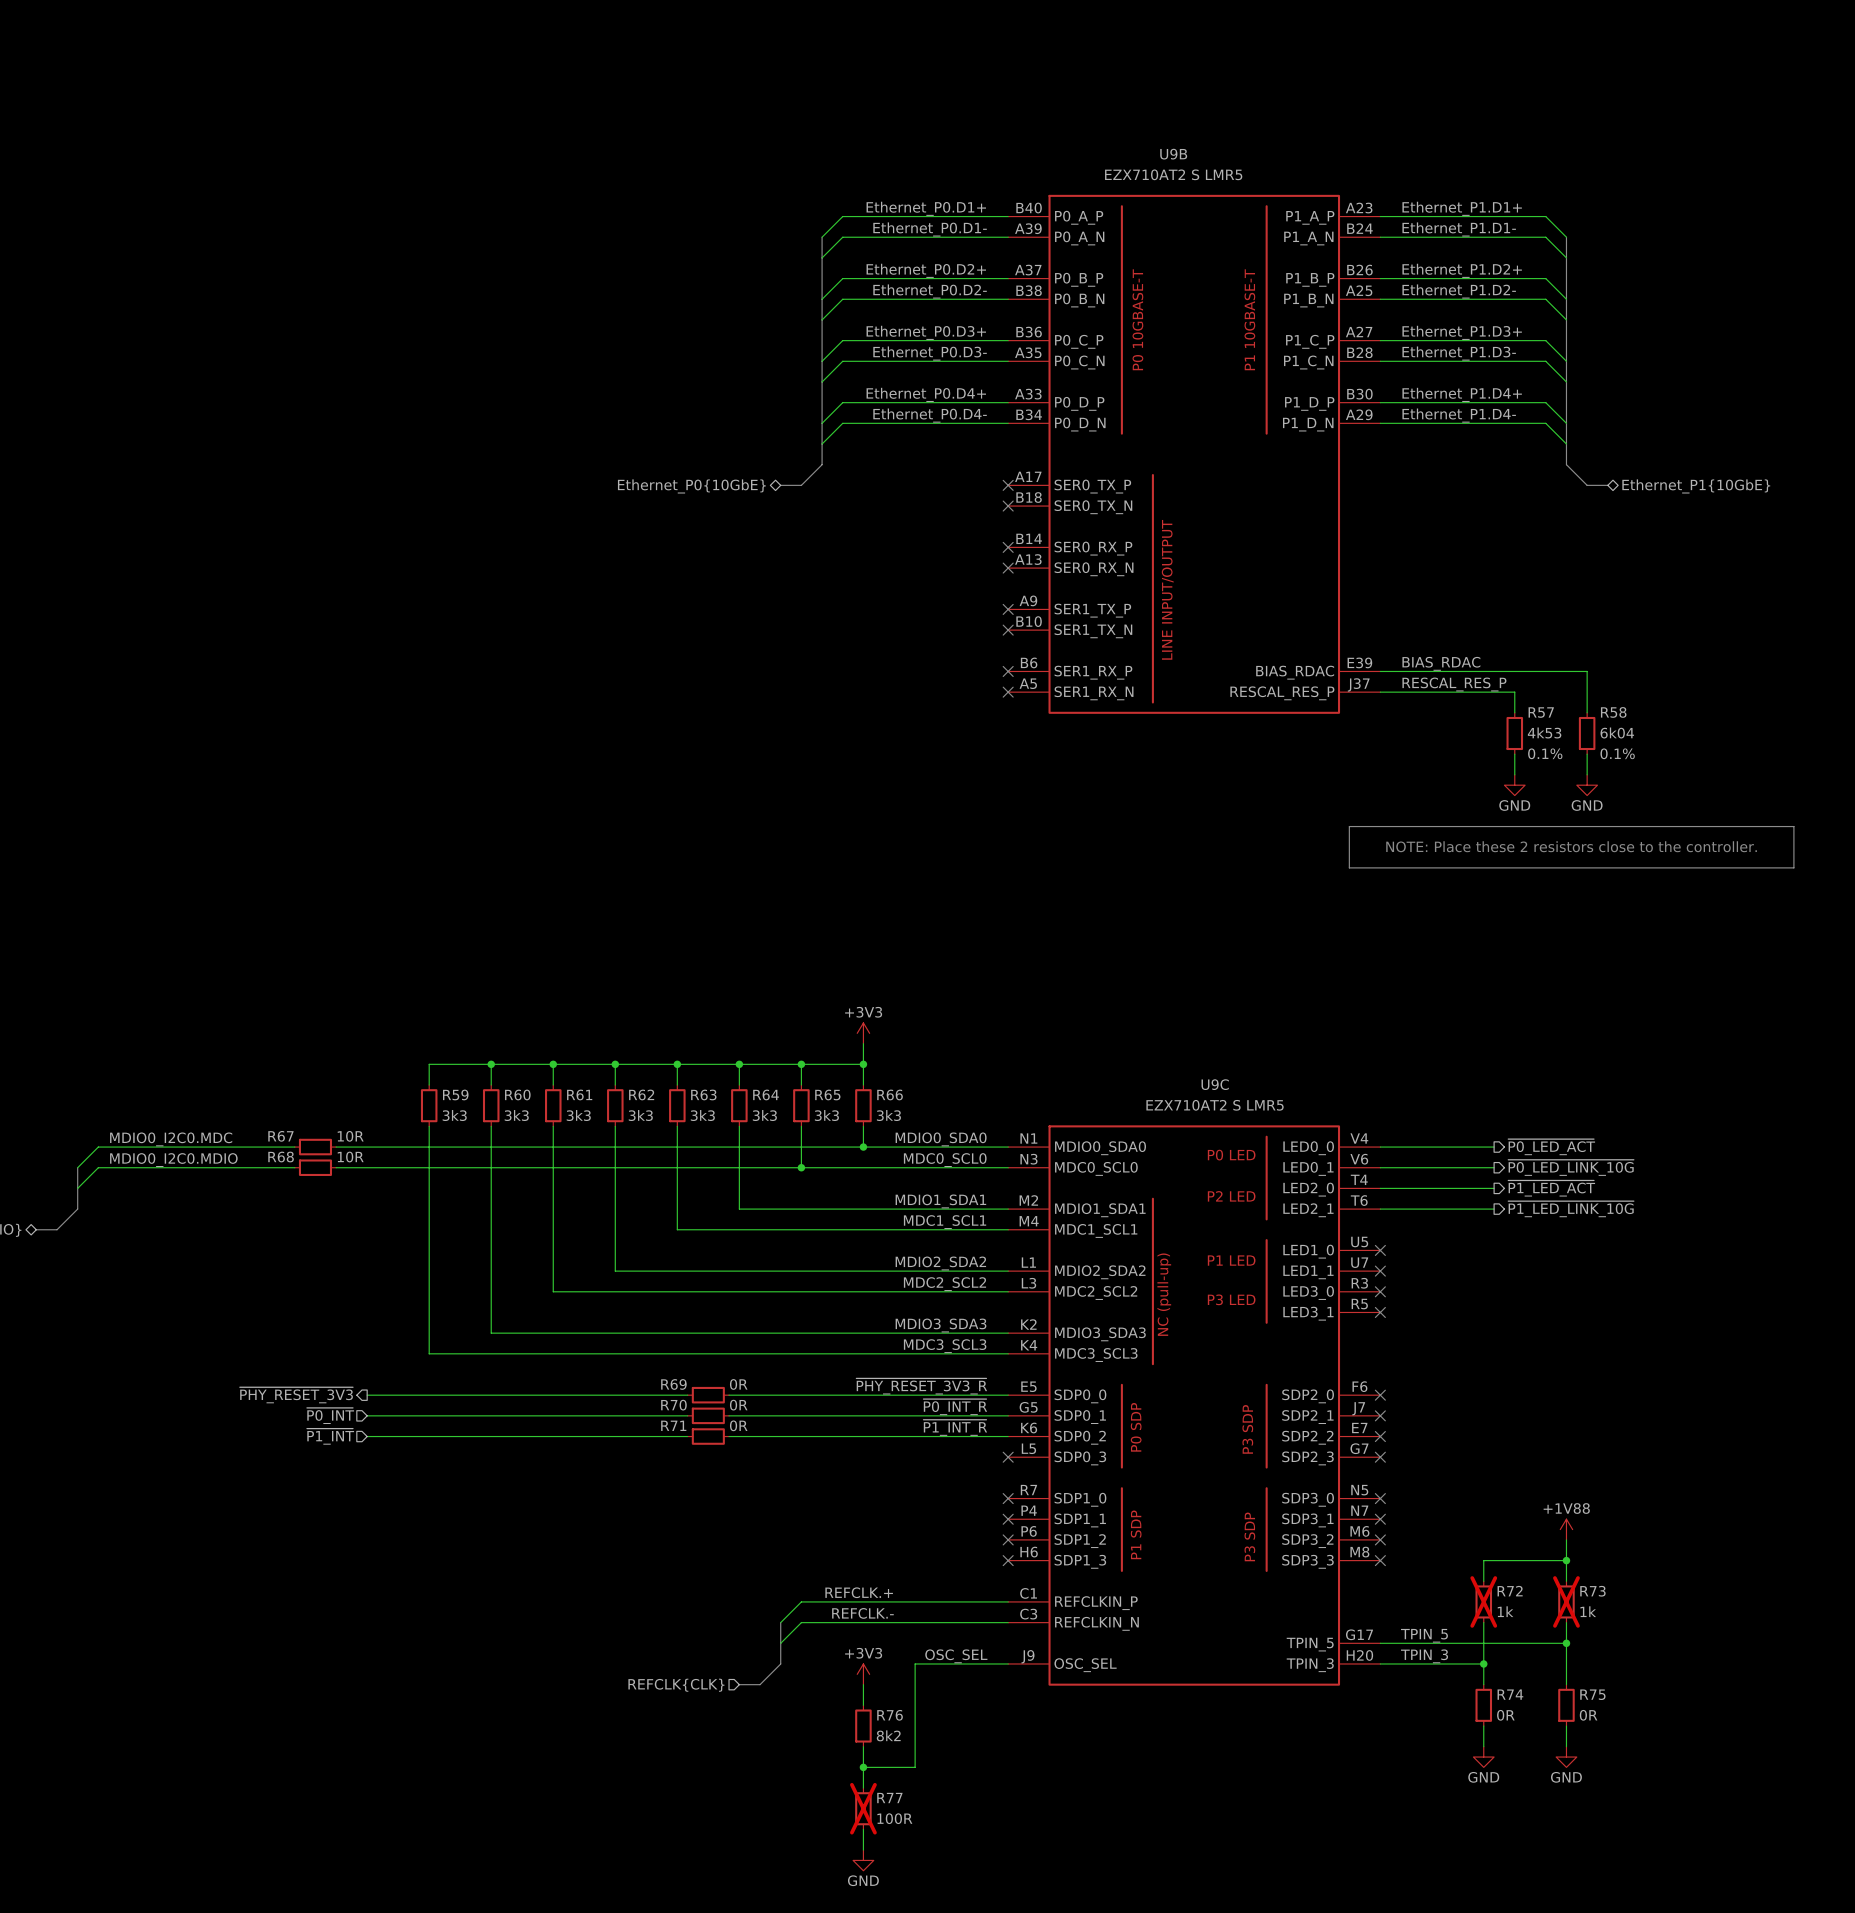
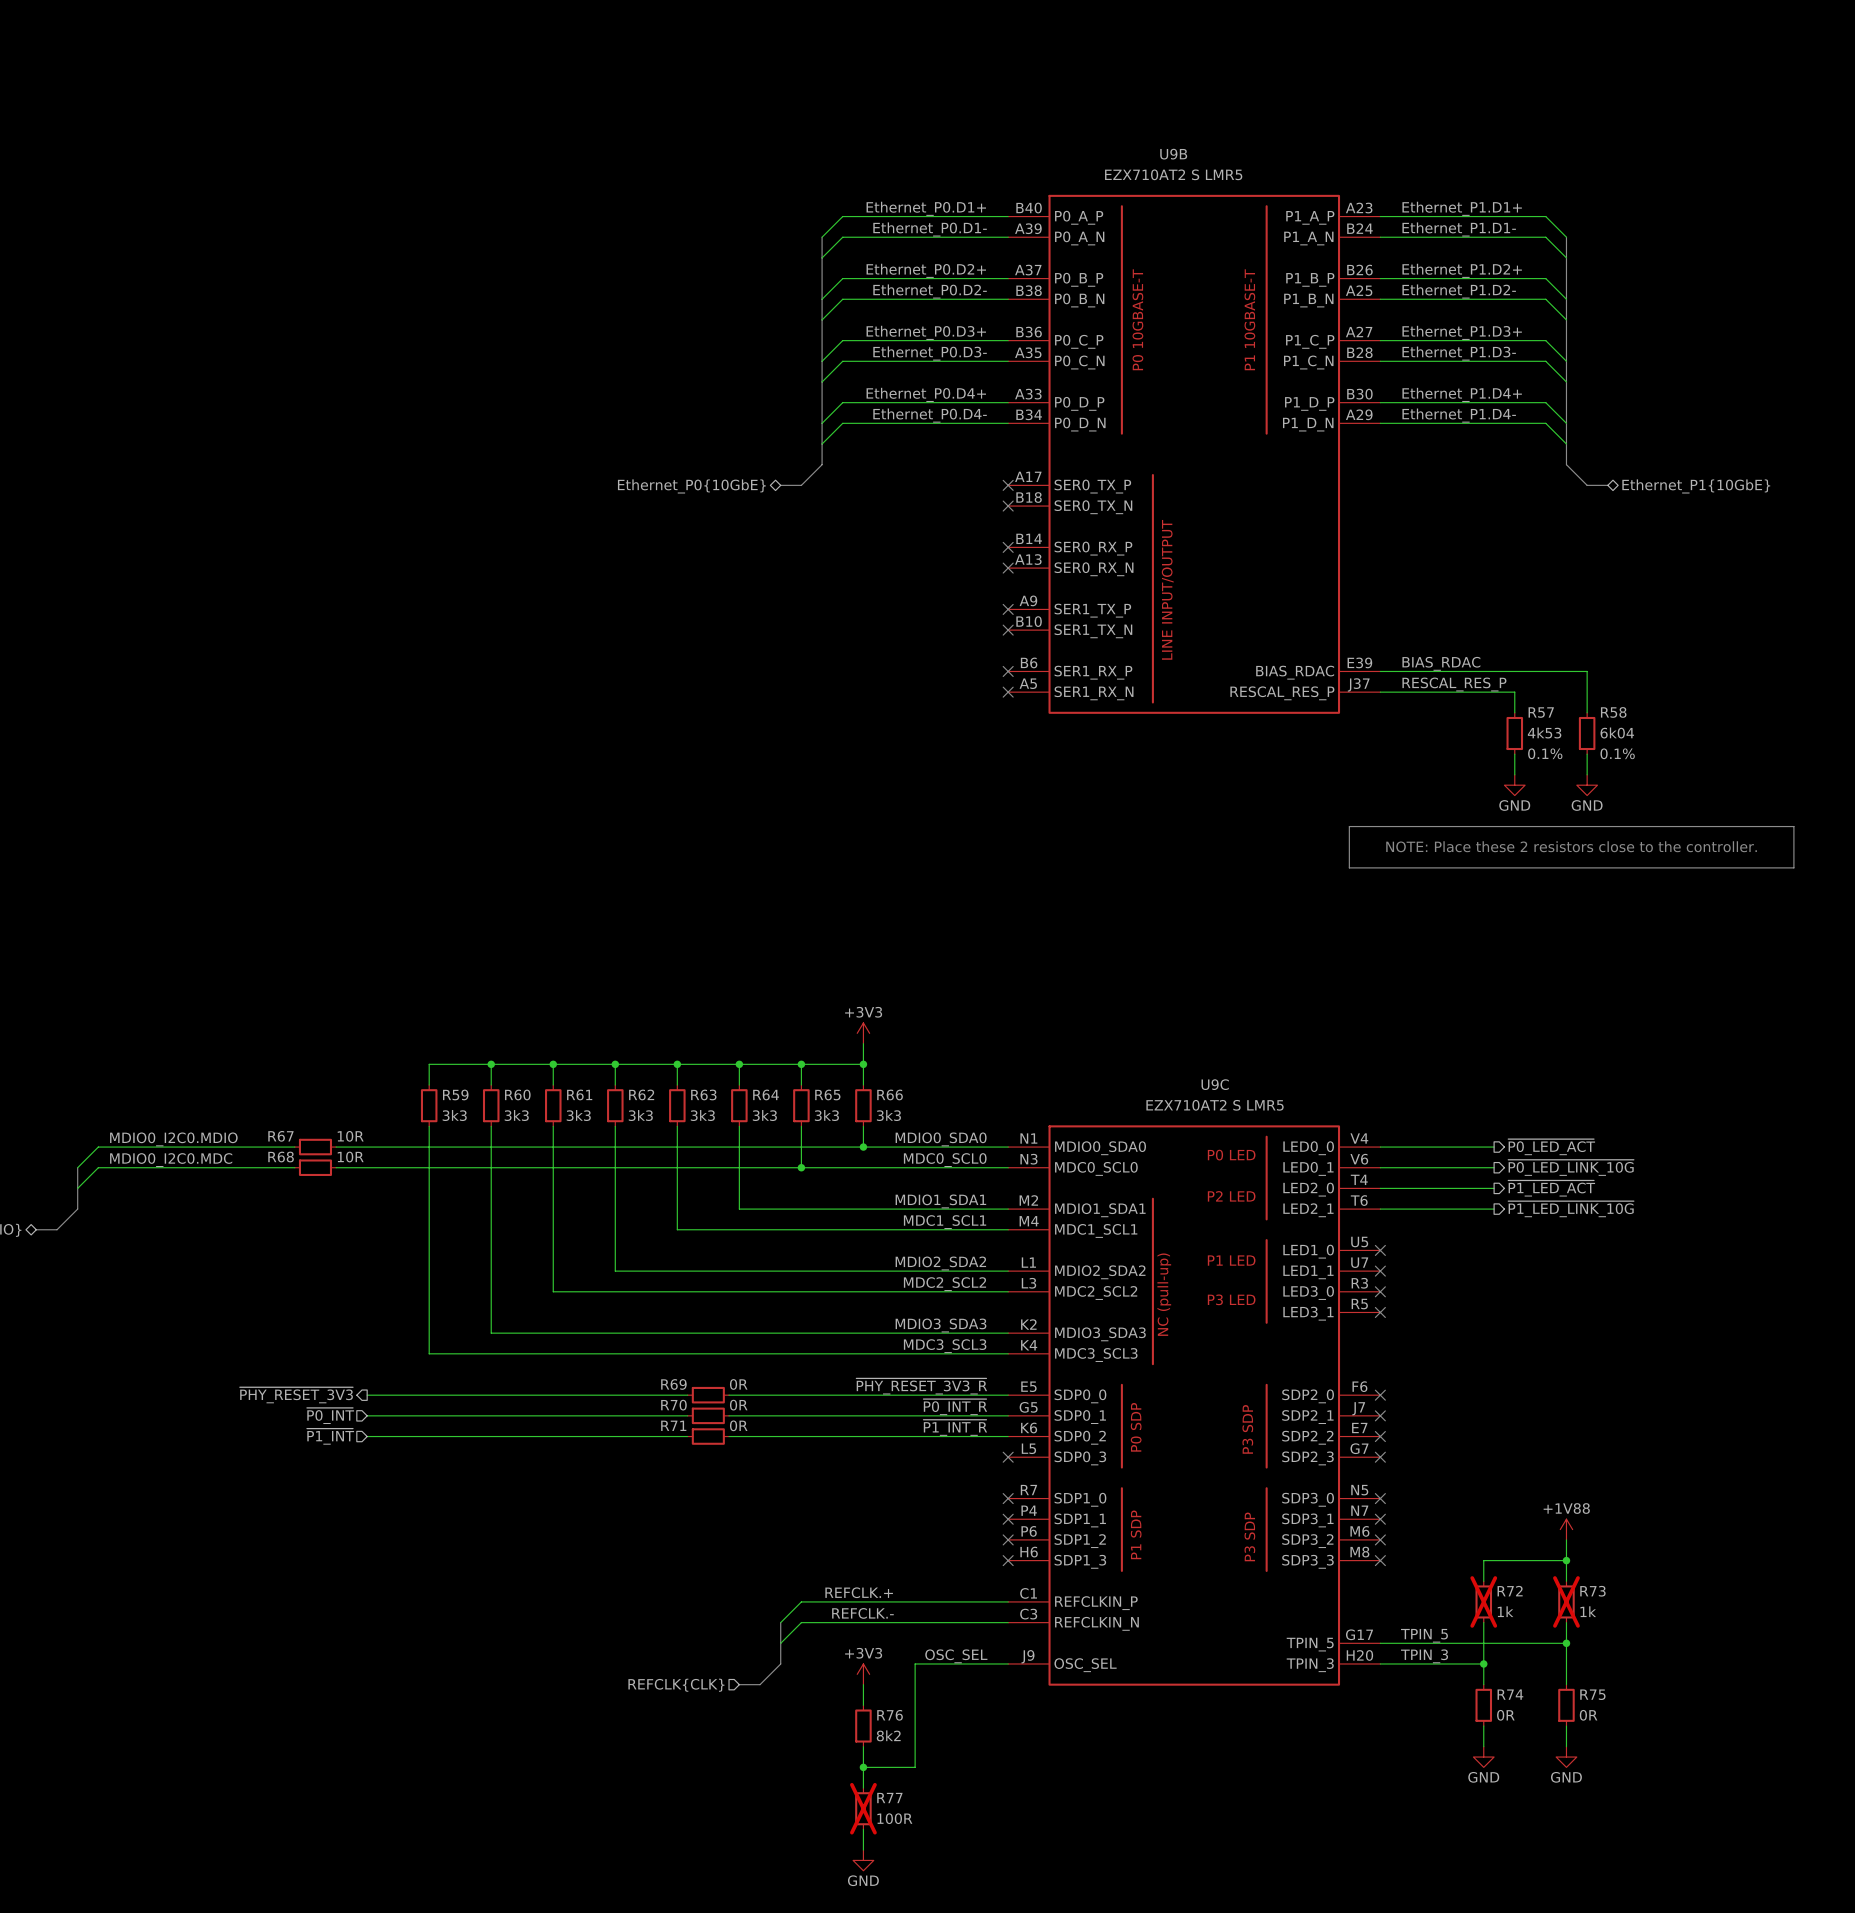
label: MDIO0_I2C0.MDC (171, 1139) -> MDIO0_I2C0.MDIO (173, 1139)
label: MDIO0_I2C0.MDIO (173, 1160) -> MDIO0_I2C0.MDC (171, 1160)

